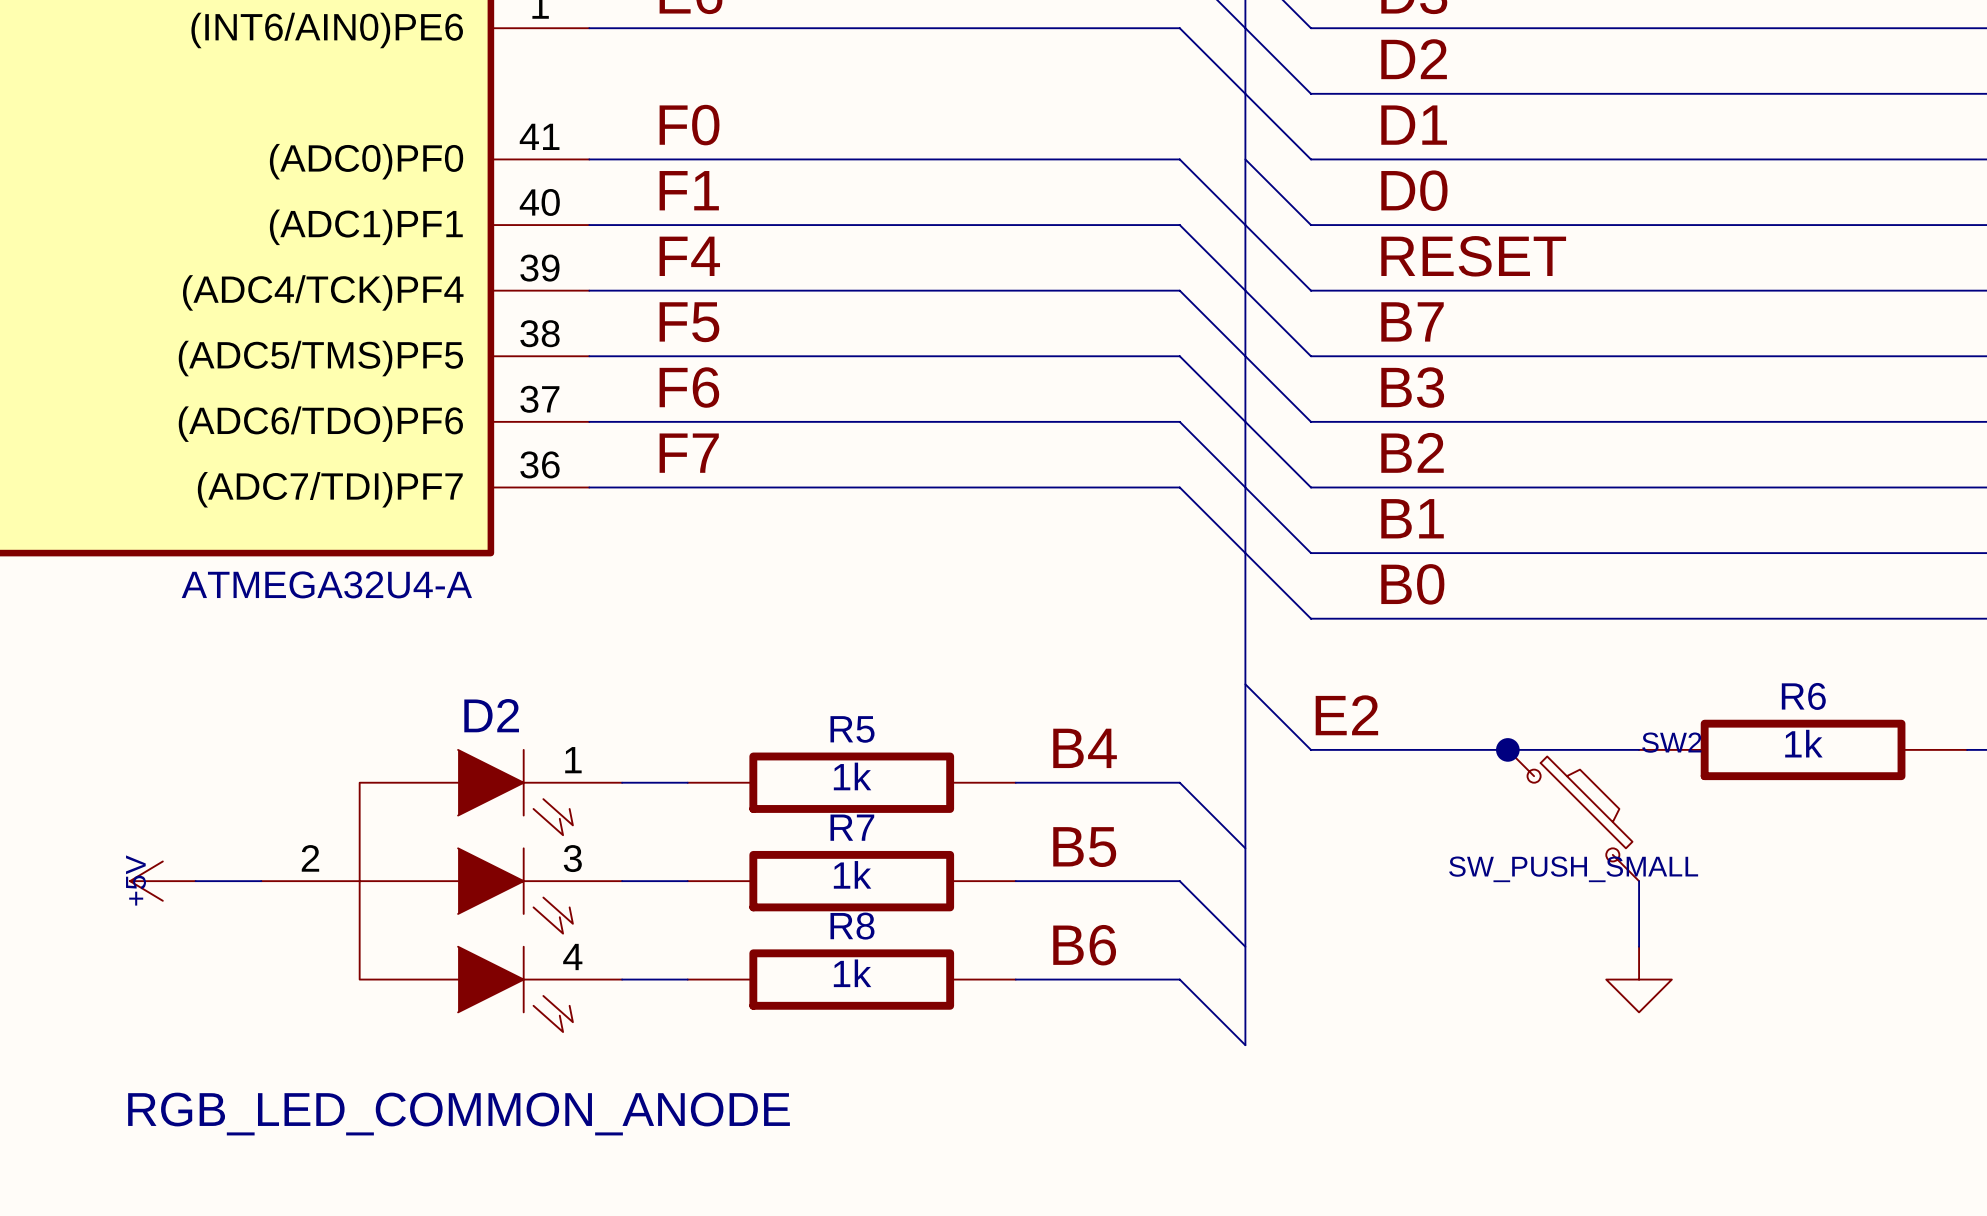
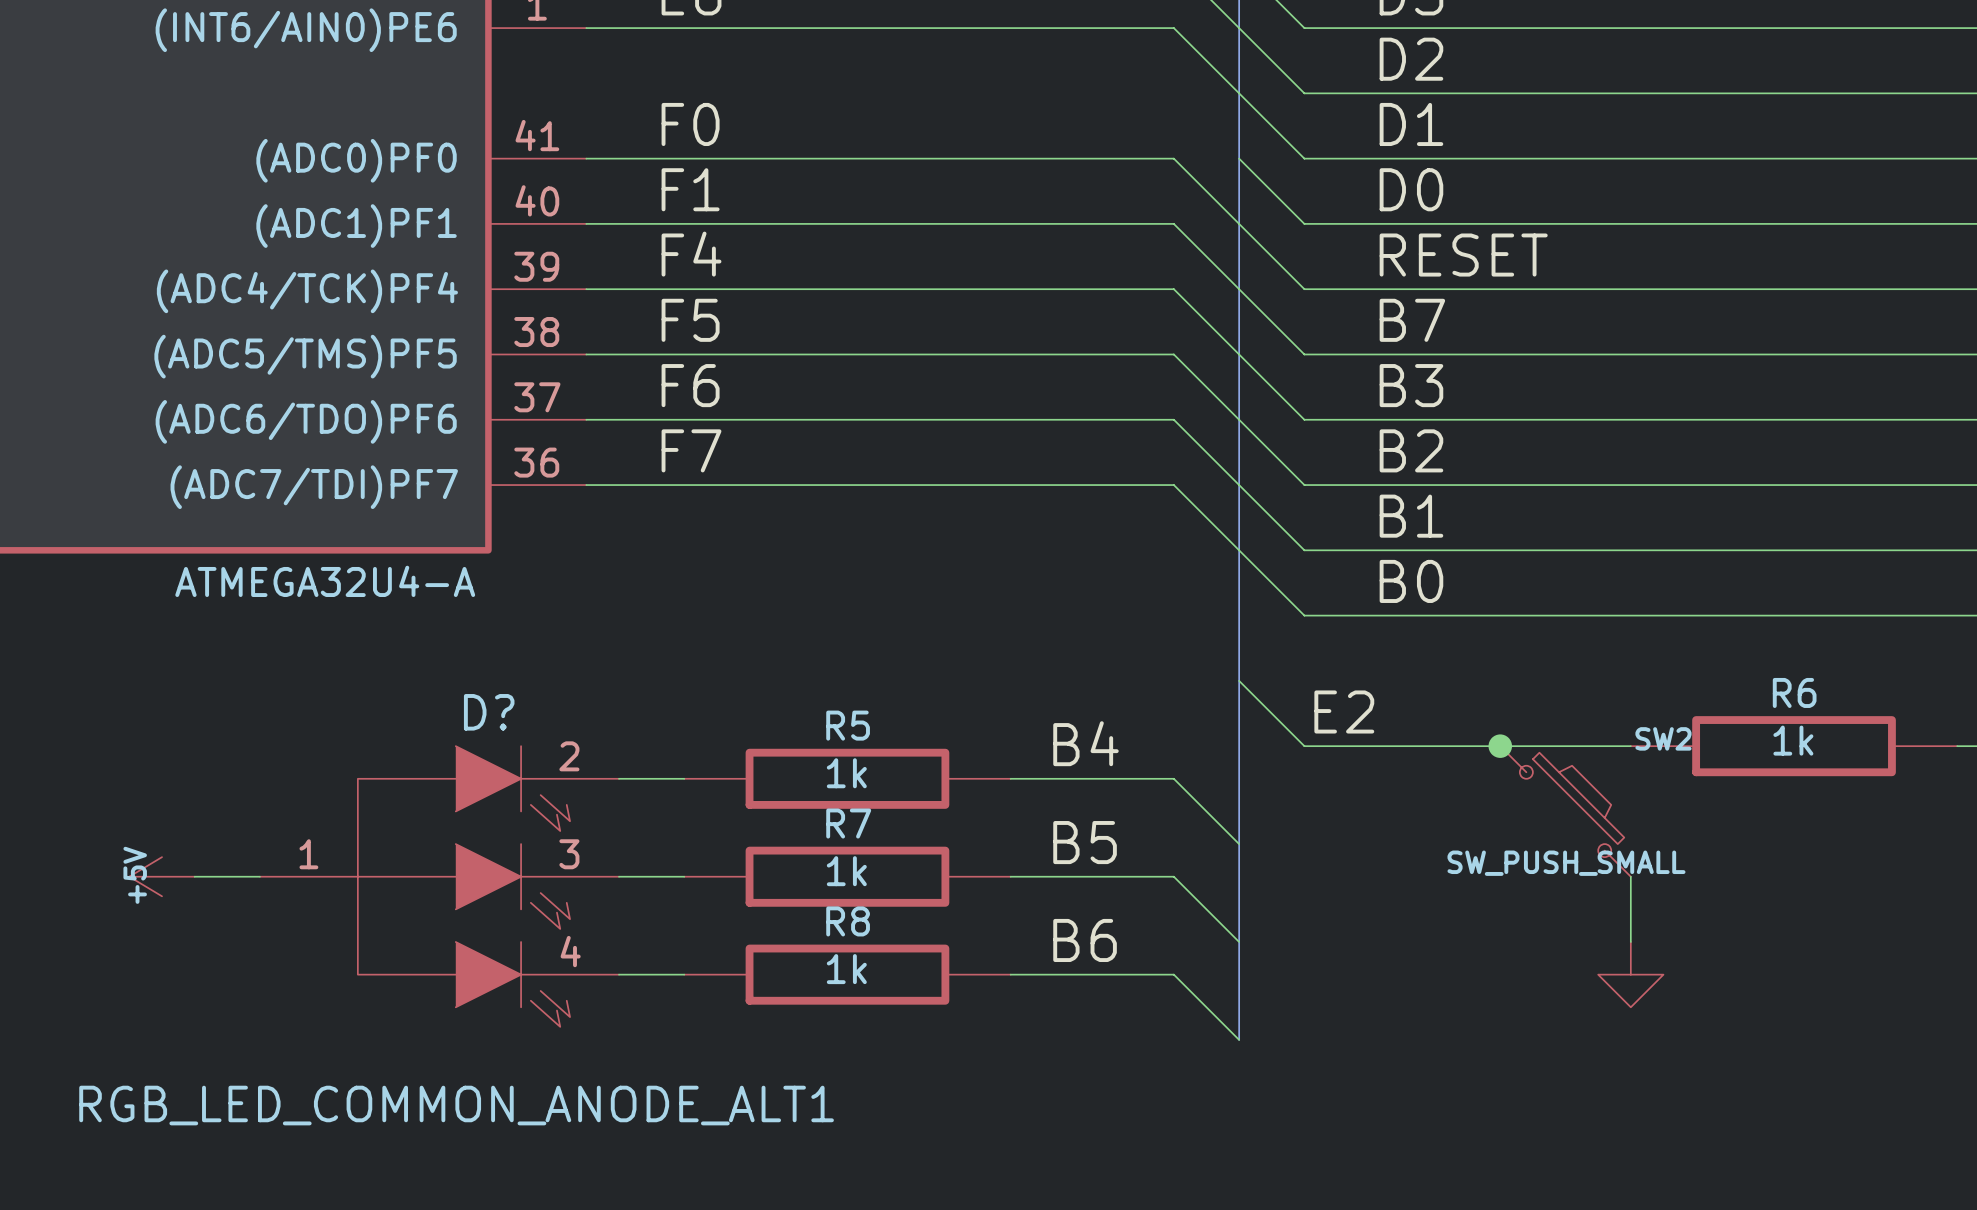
D2 name: D2 (491, 715) -> D? (489, 712)
D2 pin number: 1 (573, 760) -> 2 (569, 756)
D2 pin number: 2 (310, 858) -> 1 (308, 854)
D2 value: RGB_LED_COMMON_ANODE (459, 1114) -> RGB_LED_COMMON_ANODE_ALT1 (456, 1105)

